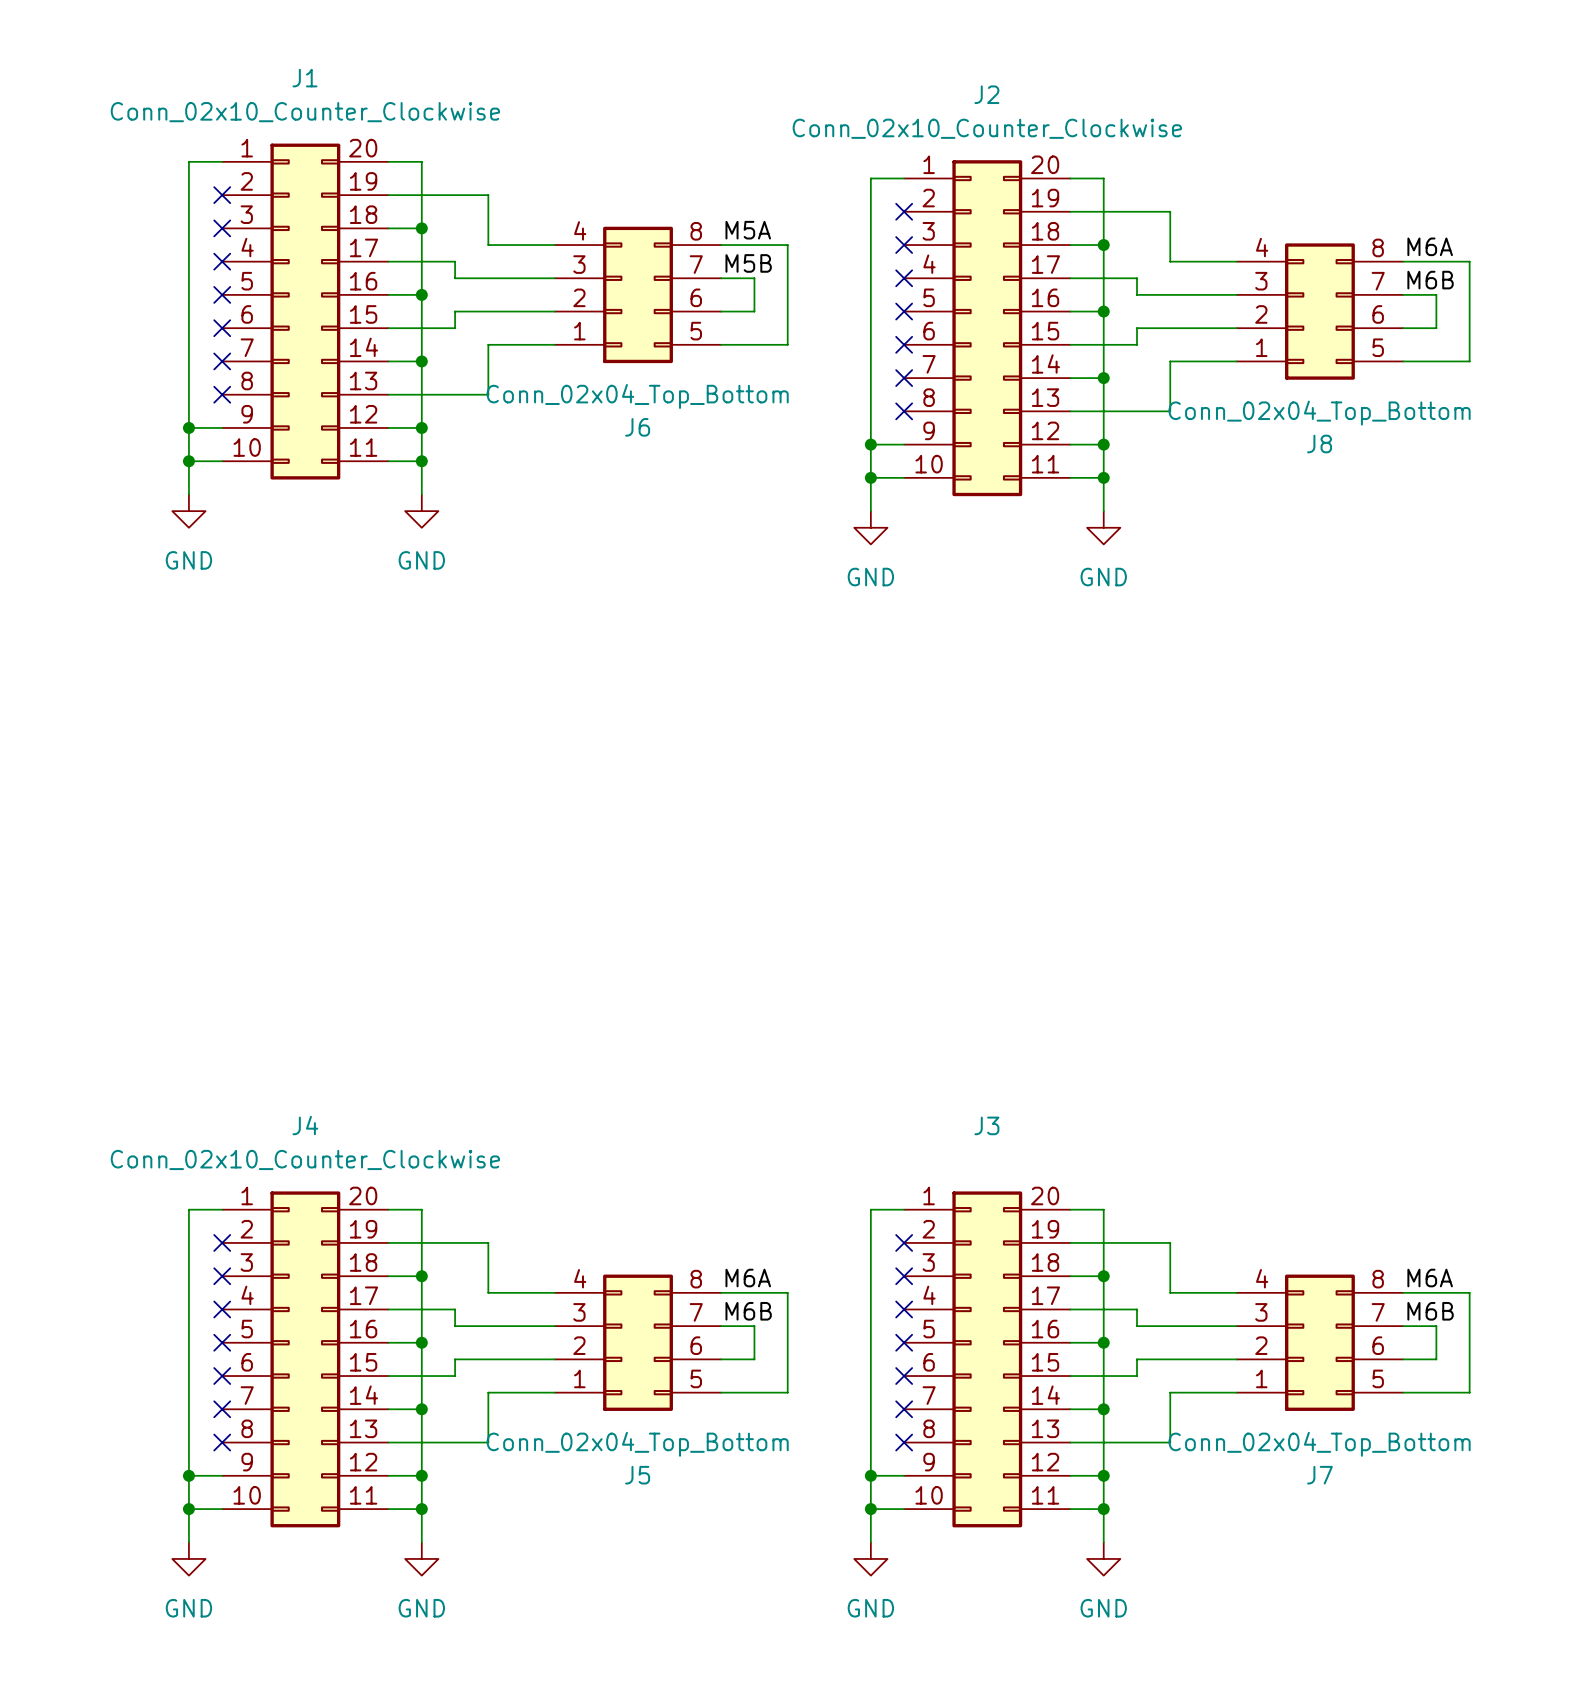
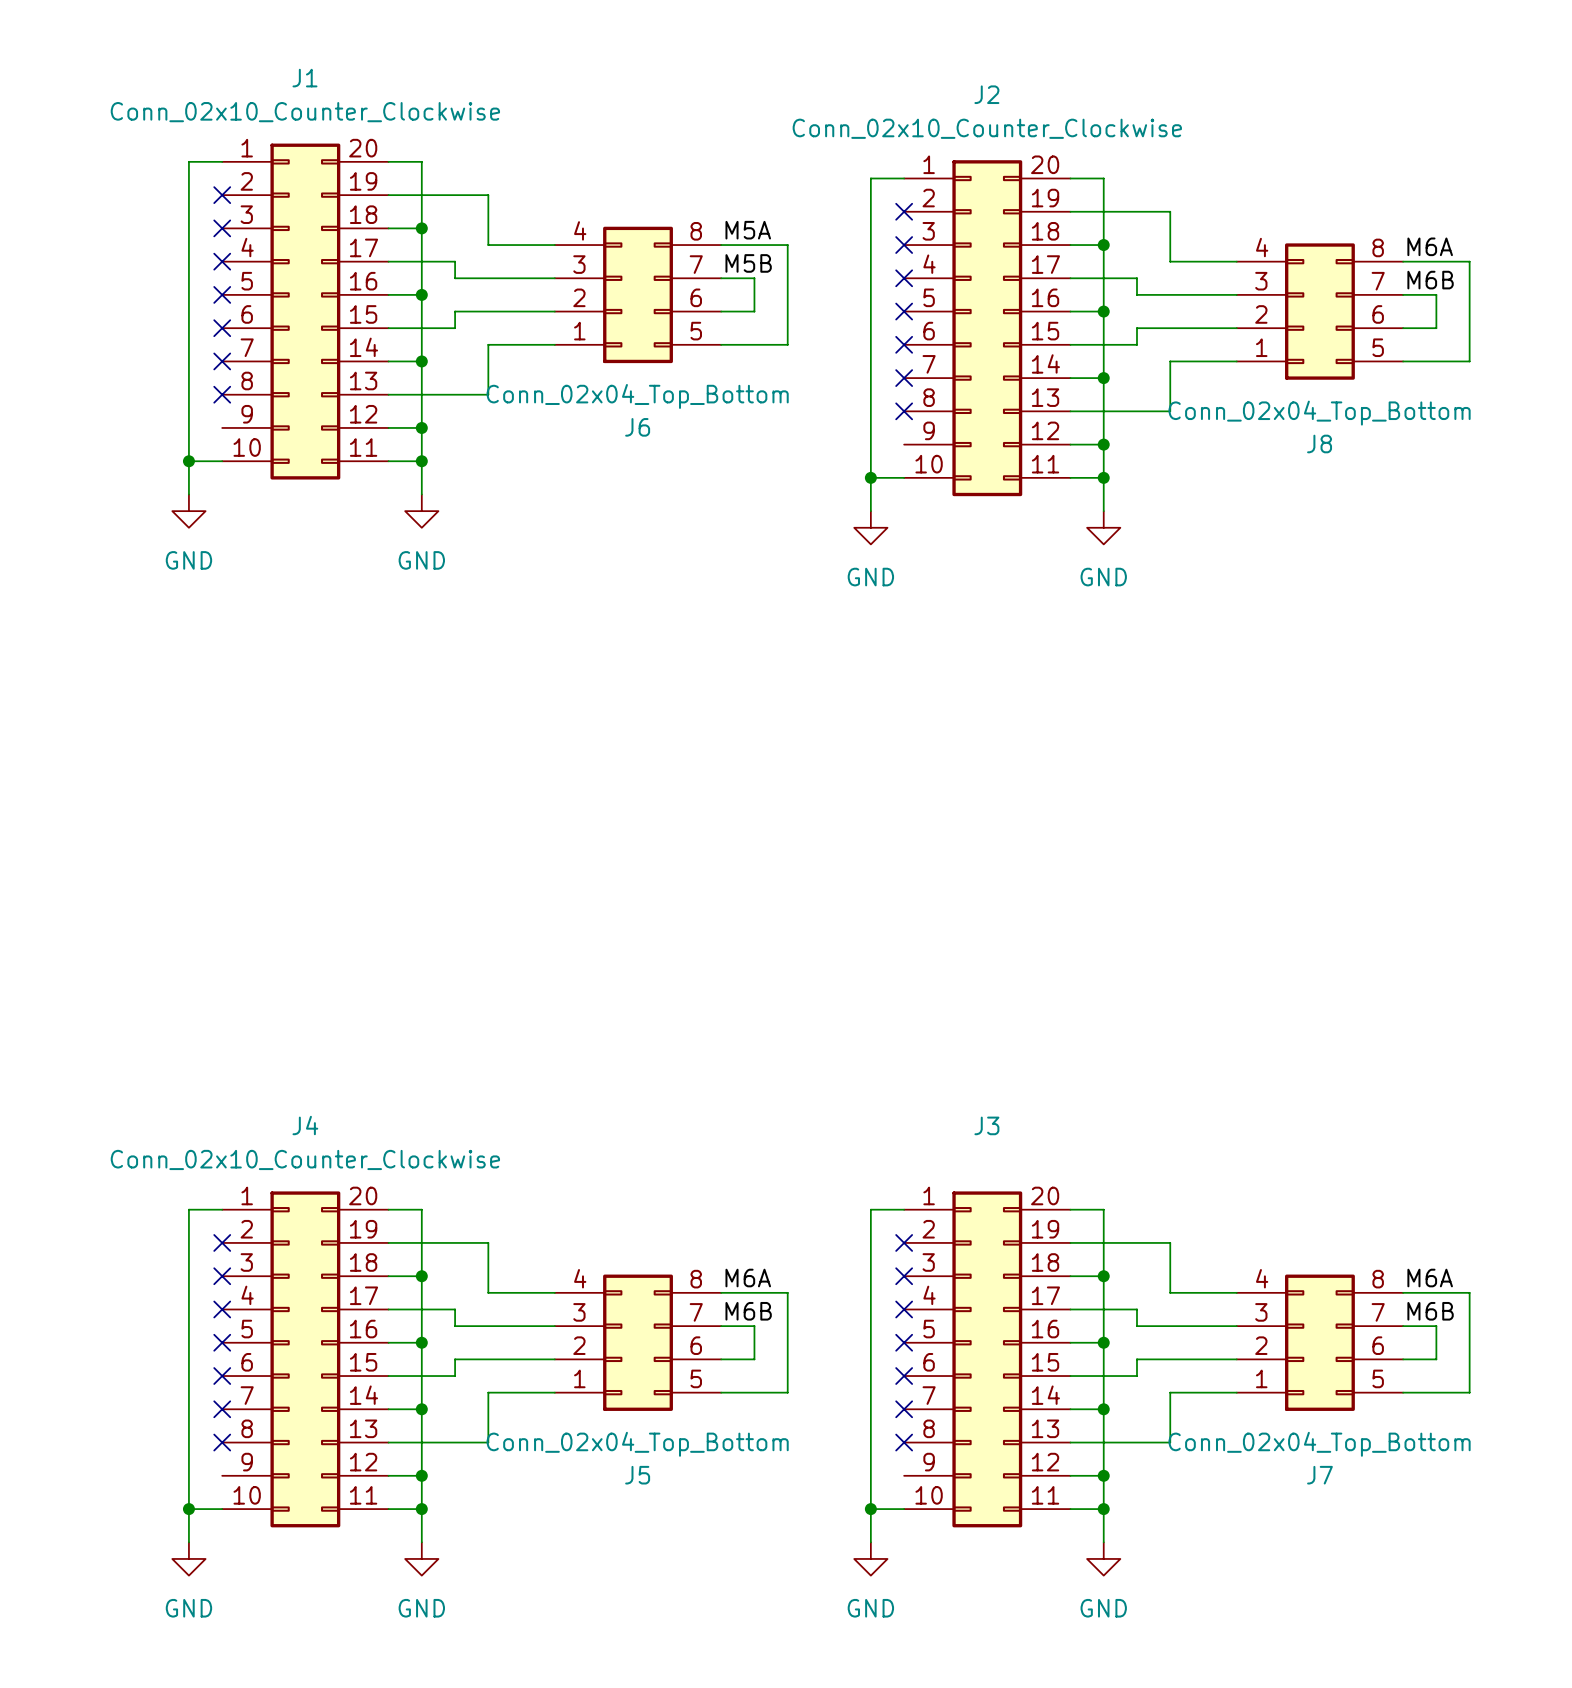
wire: (188, 427) (222, 427) -> none
junction: (188, 427) -> none
wire: (870, 444) (904, 444) -> none
junction: (870, 444) -> none
wire: (188, 1475) (222, 1475) -> none
junction: (188, 1475) -> none
wire: (870, 1475) (904, 1475) -> none
junction: (870, 1475) -> none

